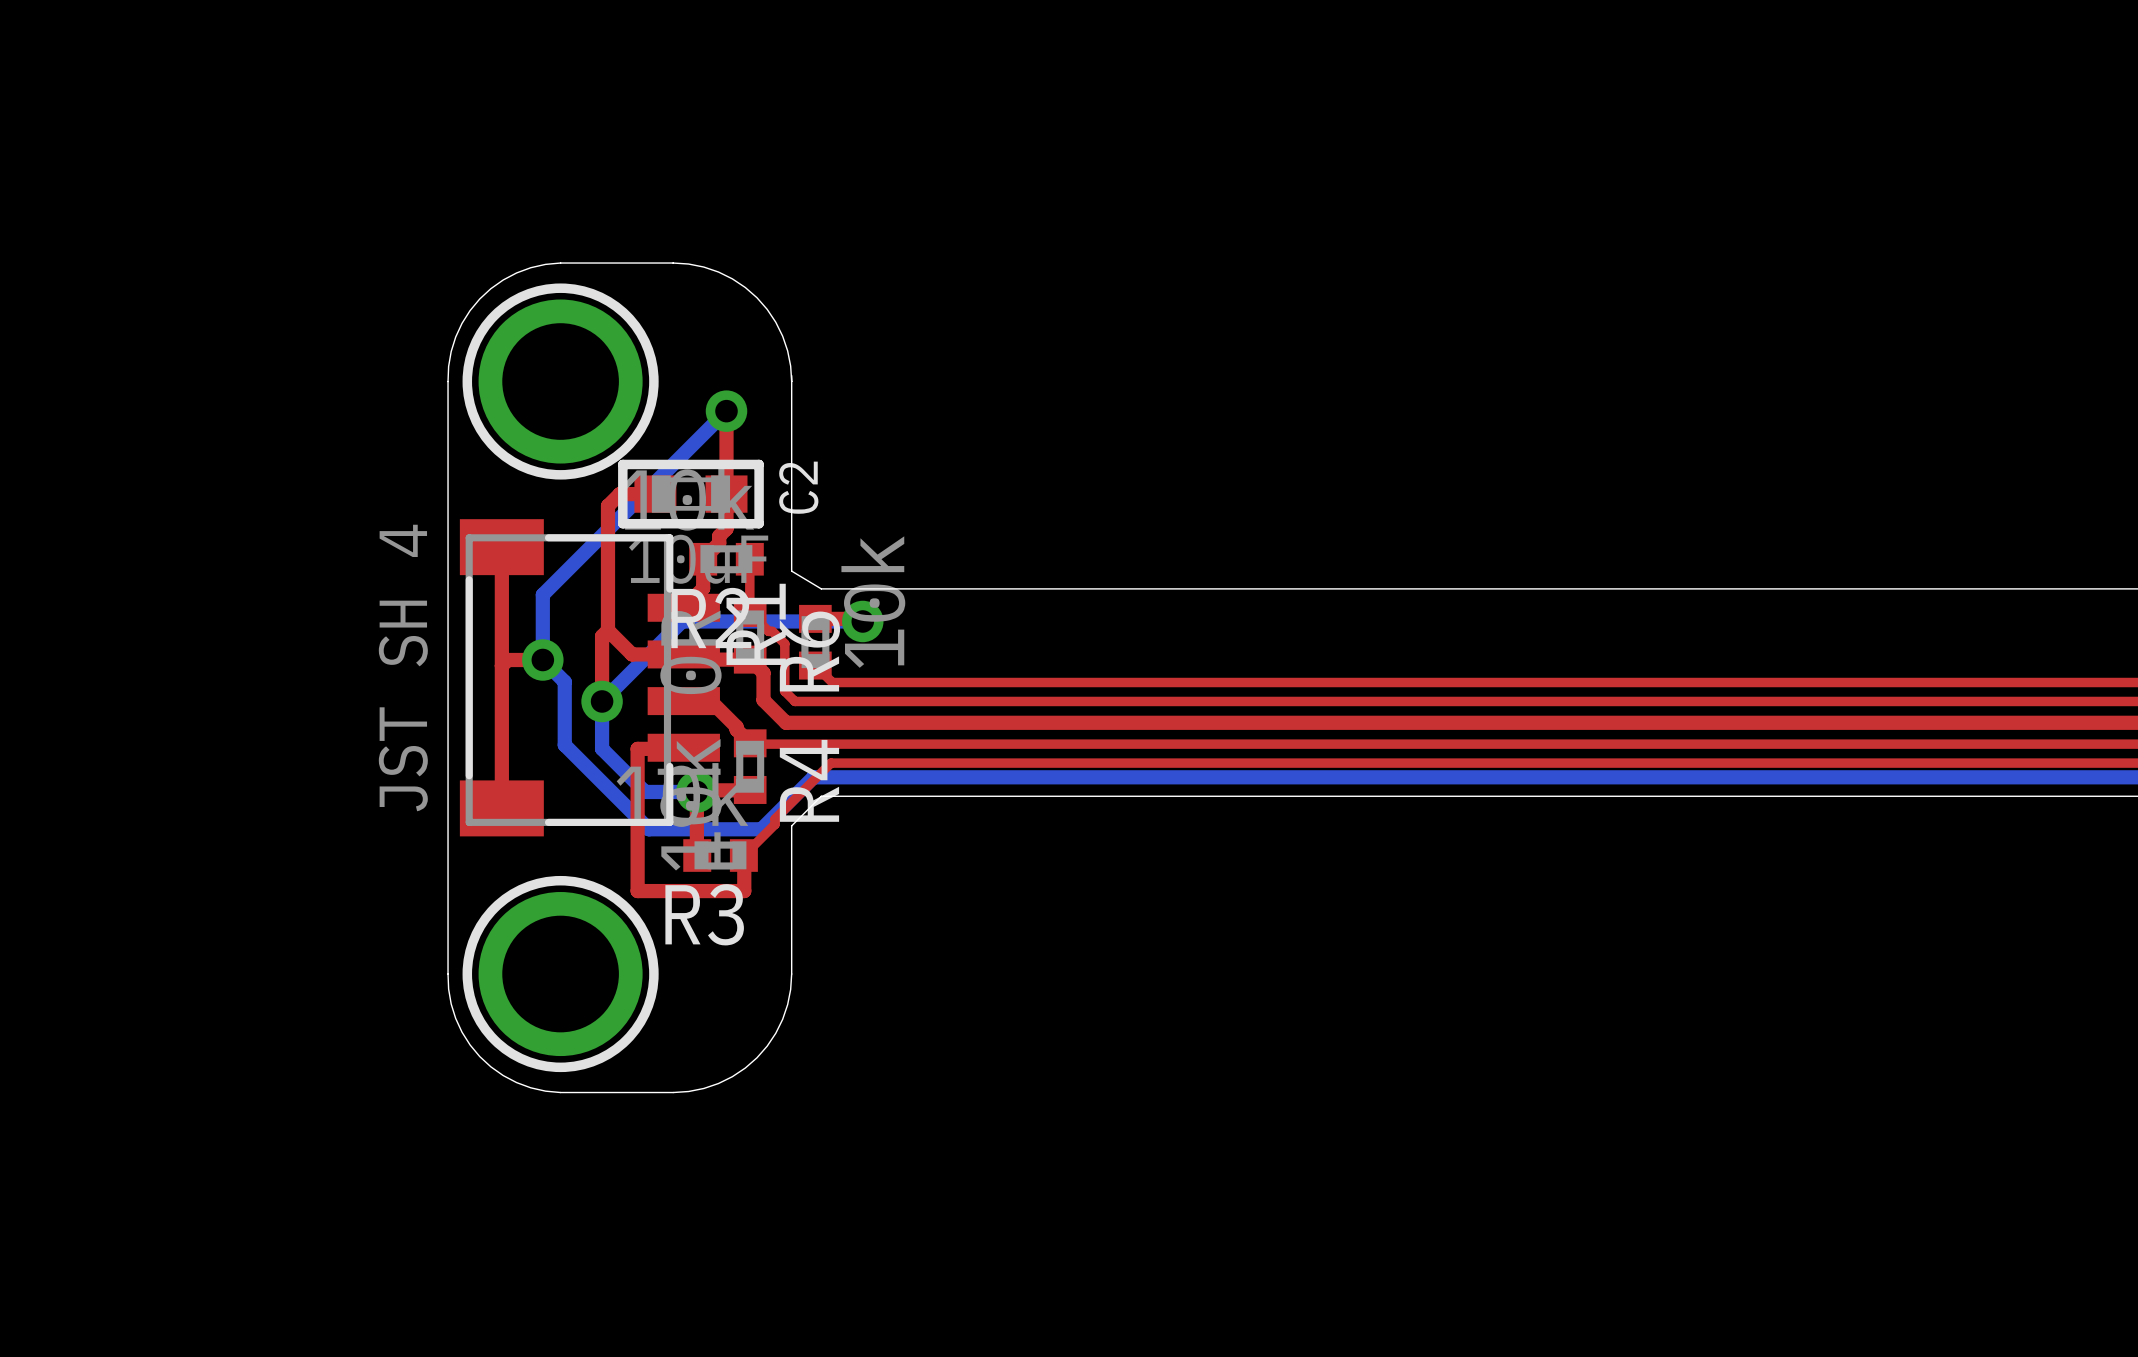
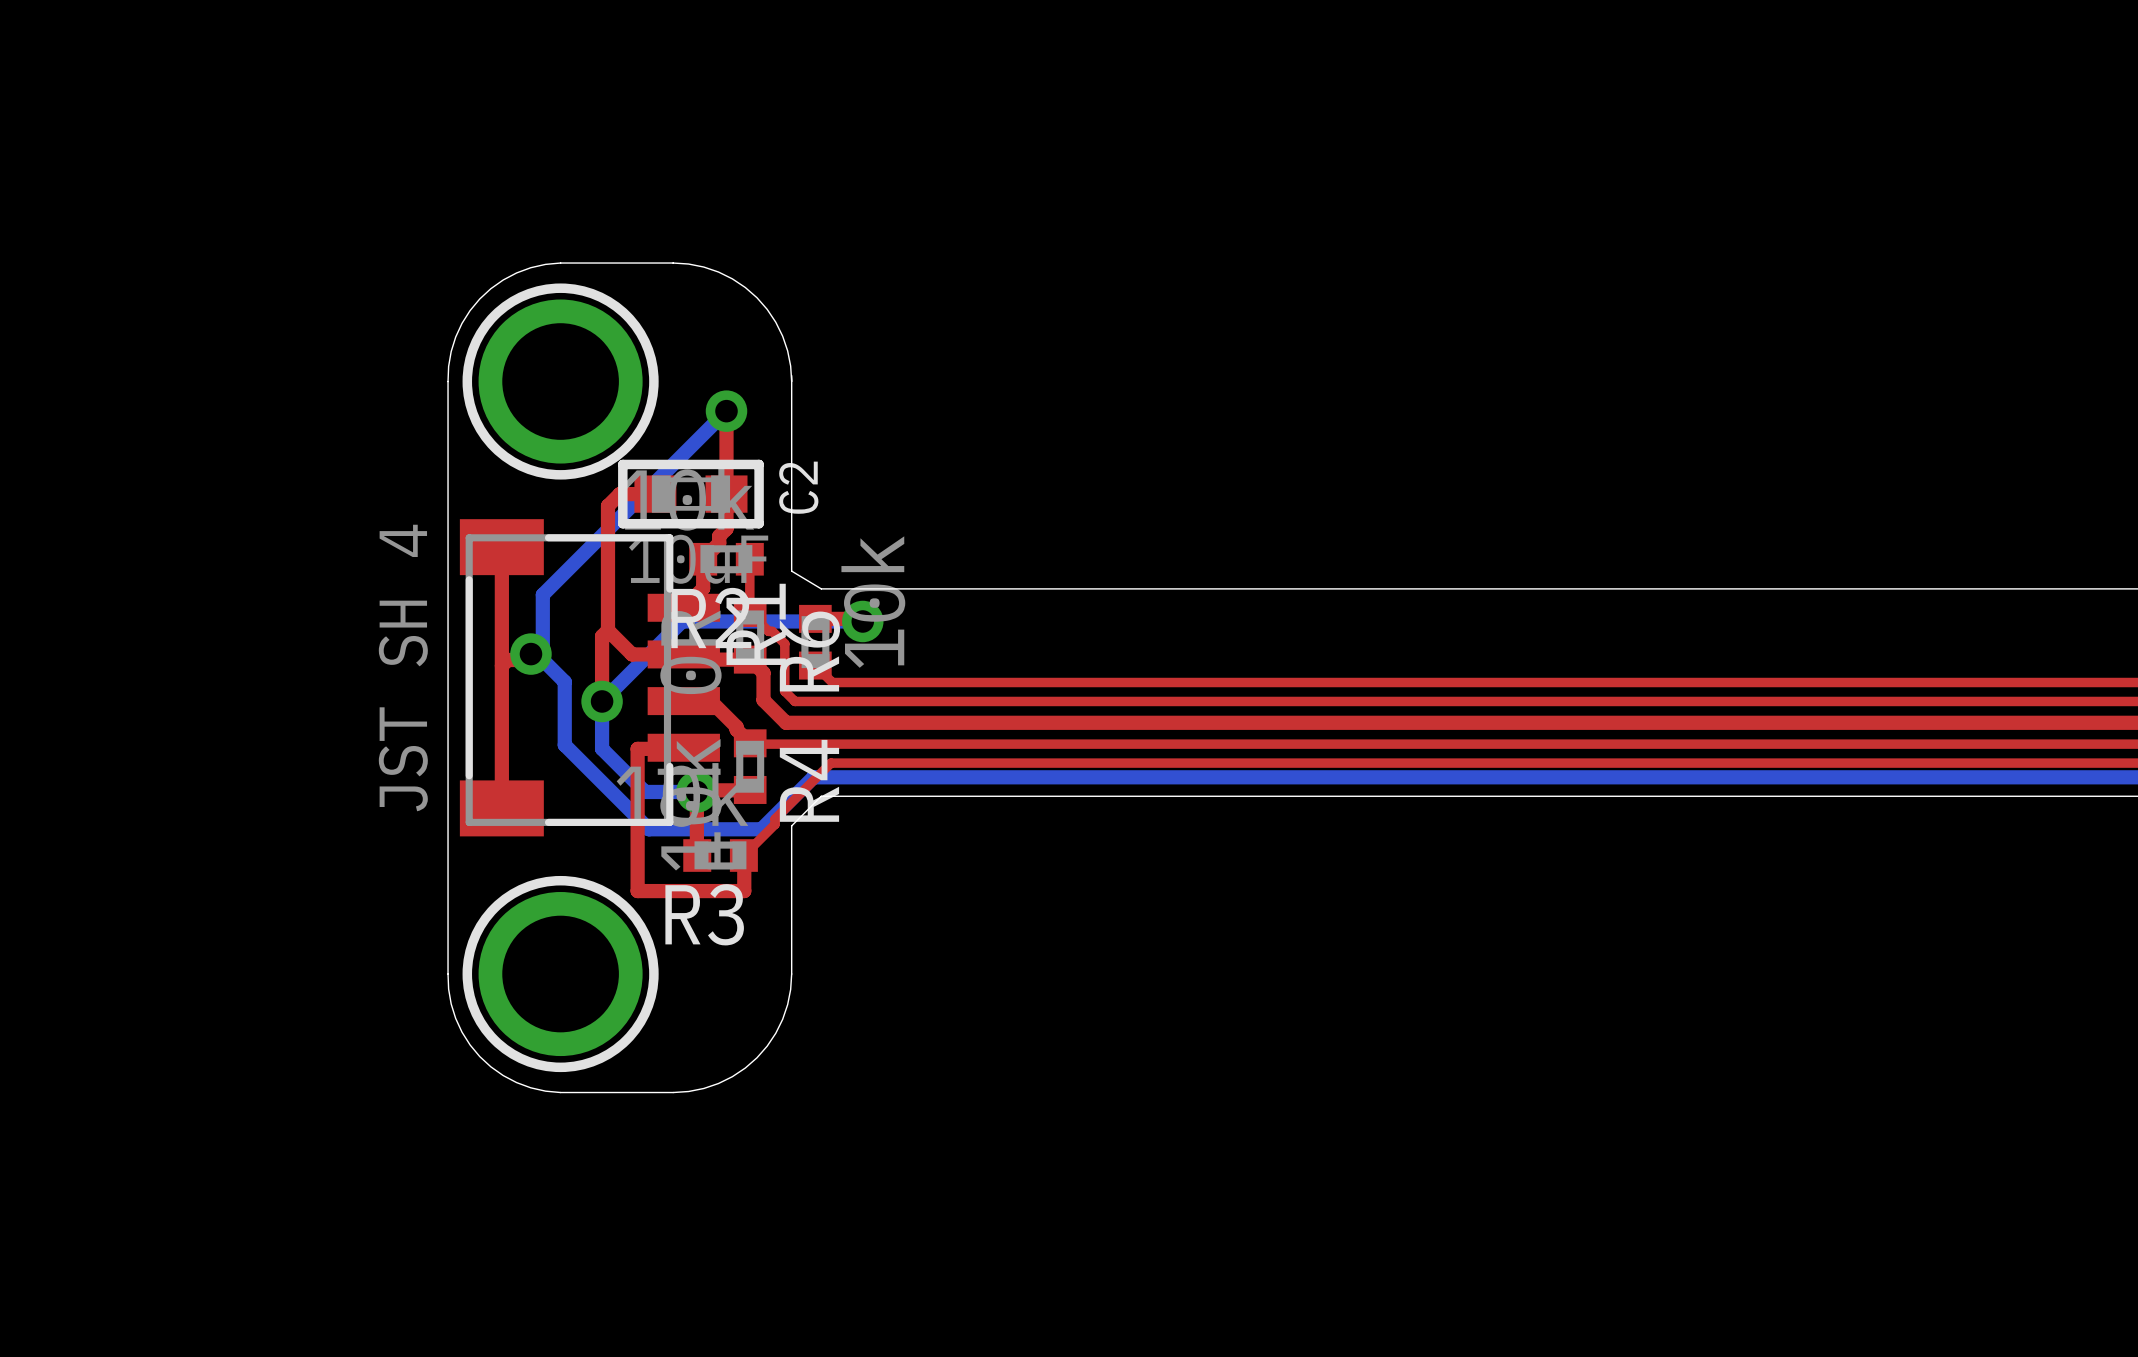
via position: (542, 659) -> (530, 654)

